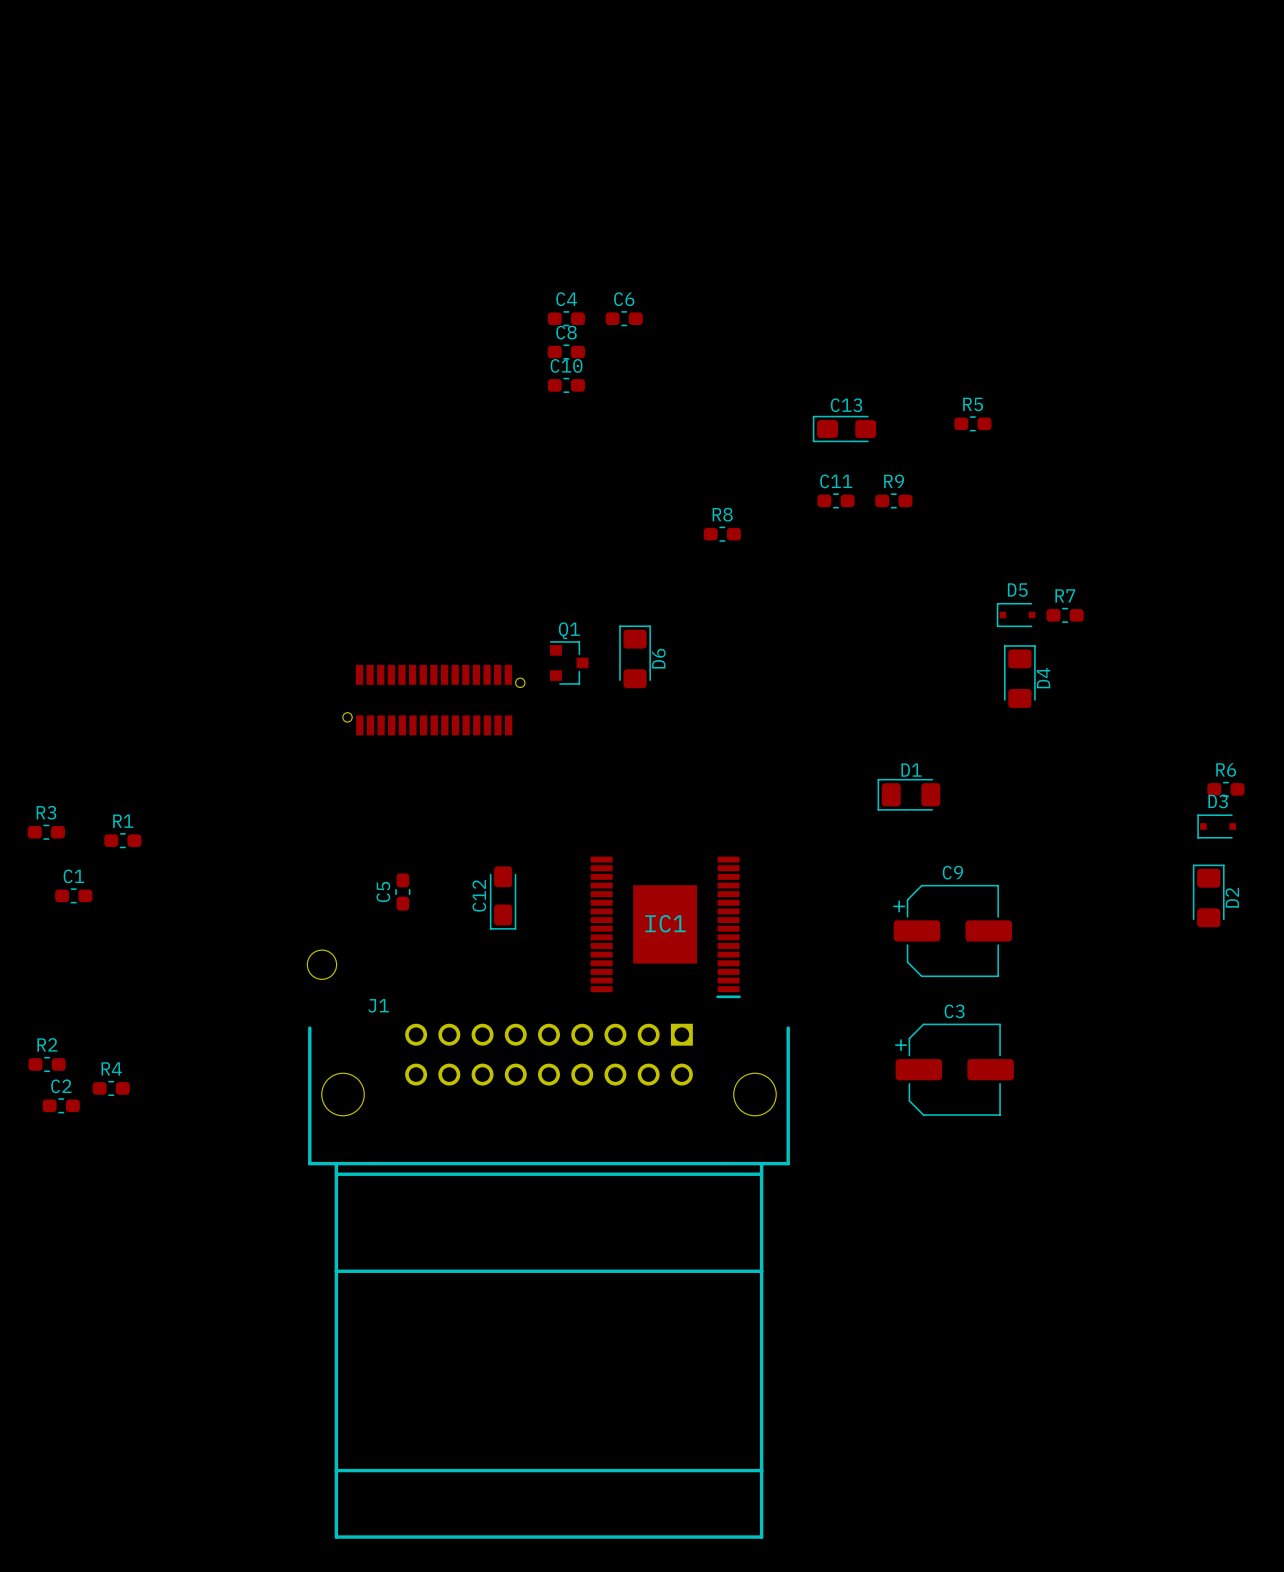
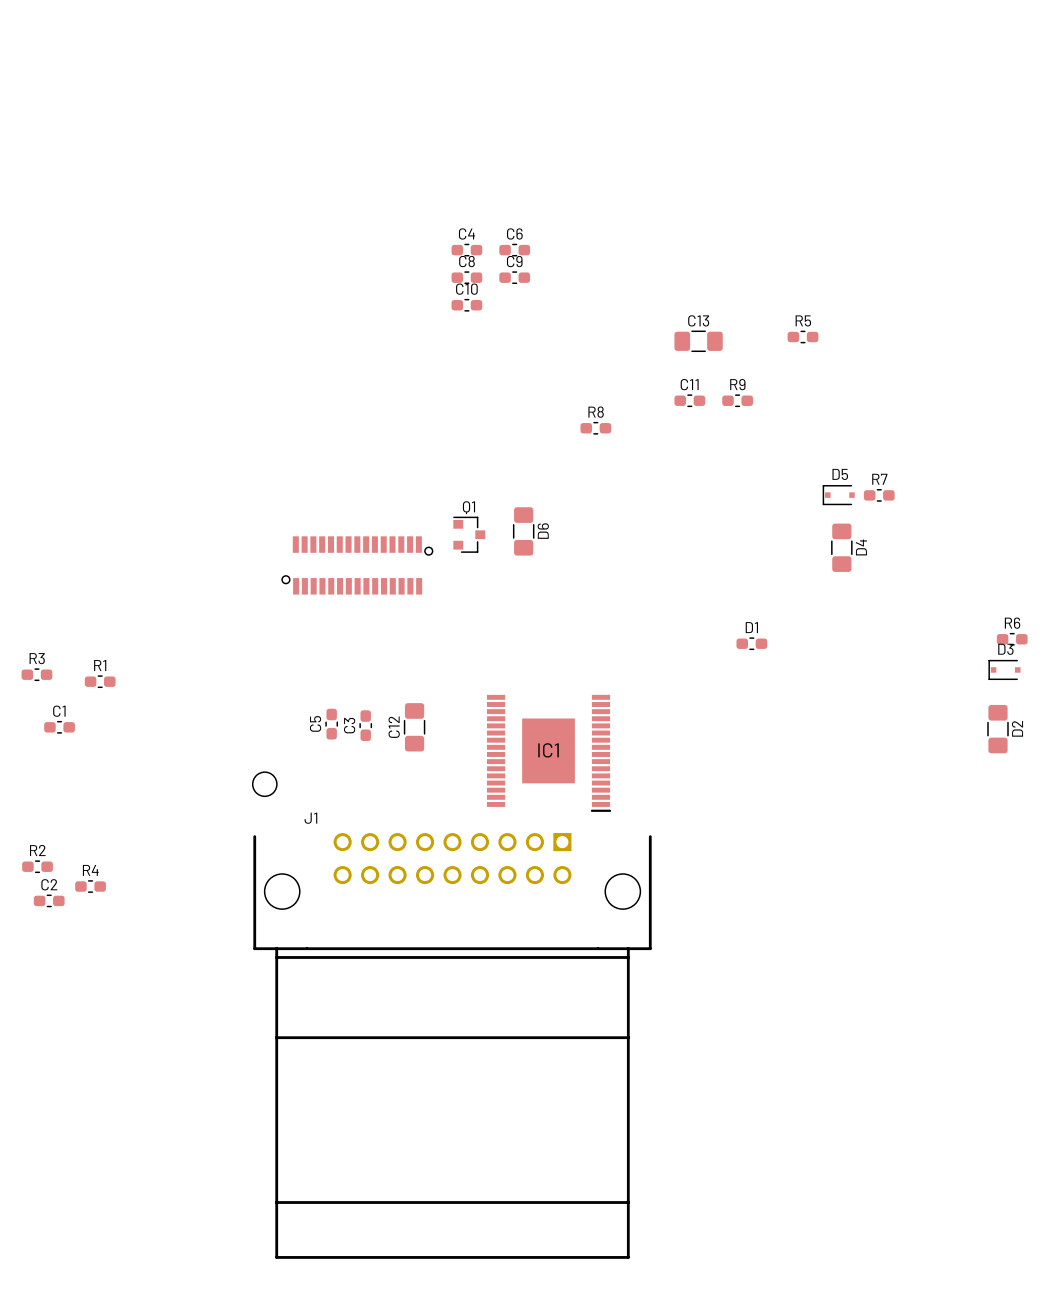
C13 footprint: [812, 415, 877, 443] -> [674, 330, 723, 352]
D6 footprint: [619, 625, 651, 689] -> [513, 507, 535, 556]
D4 footprint: [1003, 645, 1036, 708] -> [831, 523, 853, 572]
D1 footprint: [877, 778, 941, 811] -> [736, 637, 768, 650]
D2 footprint: [1192, 864, 1225, 928] -> [987, 704, 1009, 754]
C12 footprint: [489, 866, 517, 930] -> [403, 703, 426, 752]
C9 name position: C9 (952, 872) -> C9 (514, 261)
C9 footprint: [893, 884, 1013, 978] -> [499, 271, 531, 284]
C3 name position: C3 (954, 1011) -> C3 (349, 725)
C3 footprint: [894, 1023, 1014, 1116] -> [359, 710, 372, 742]

